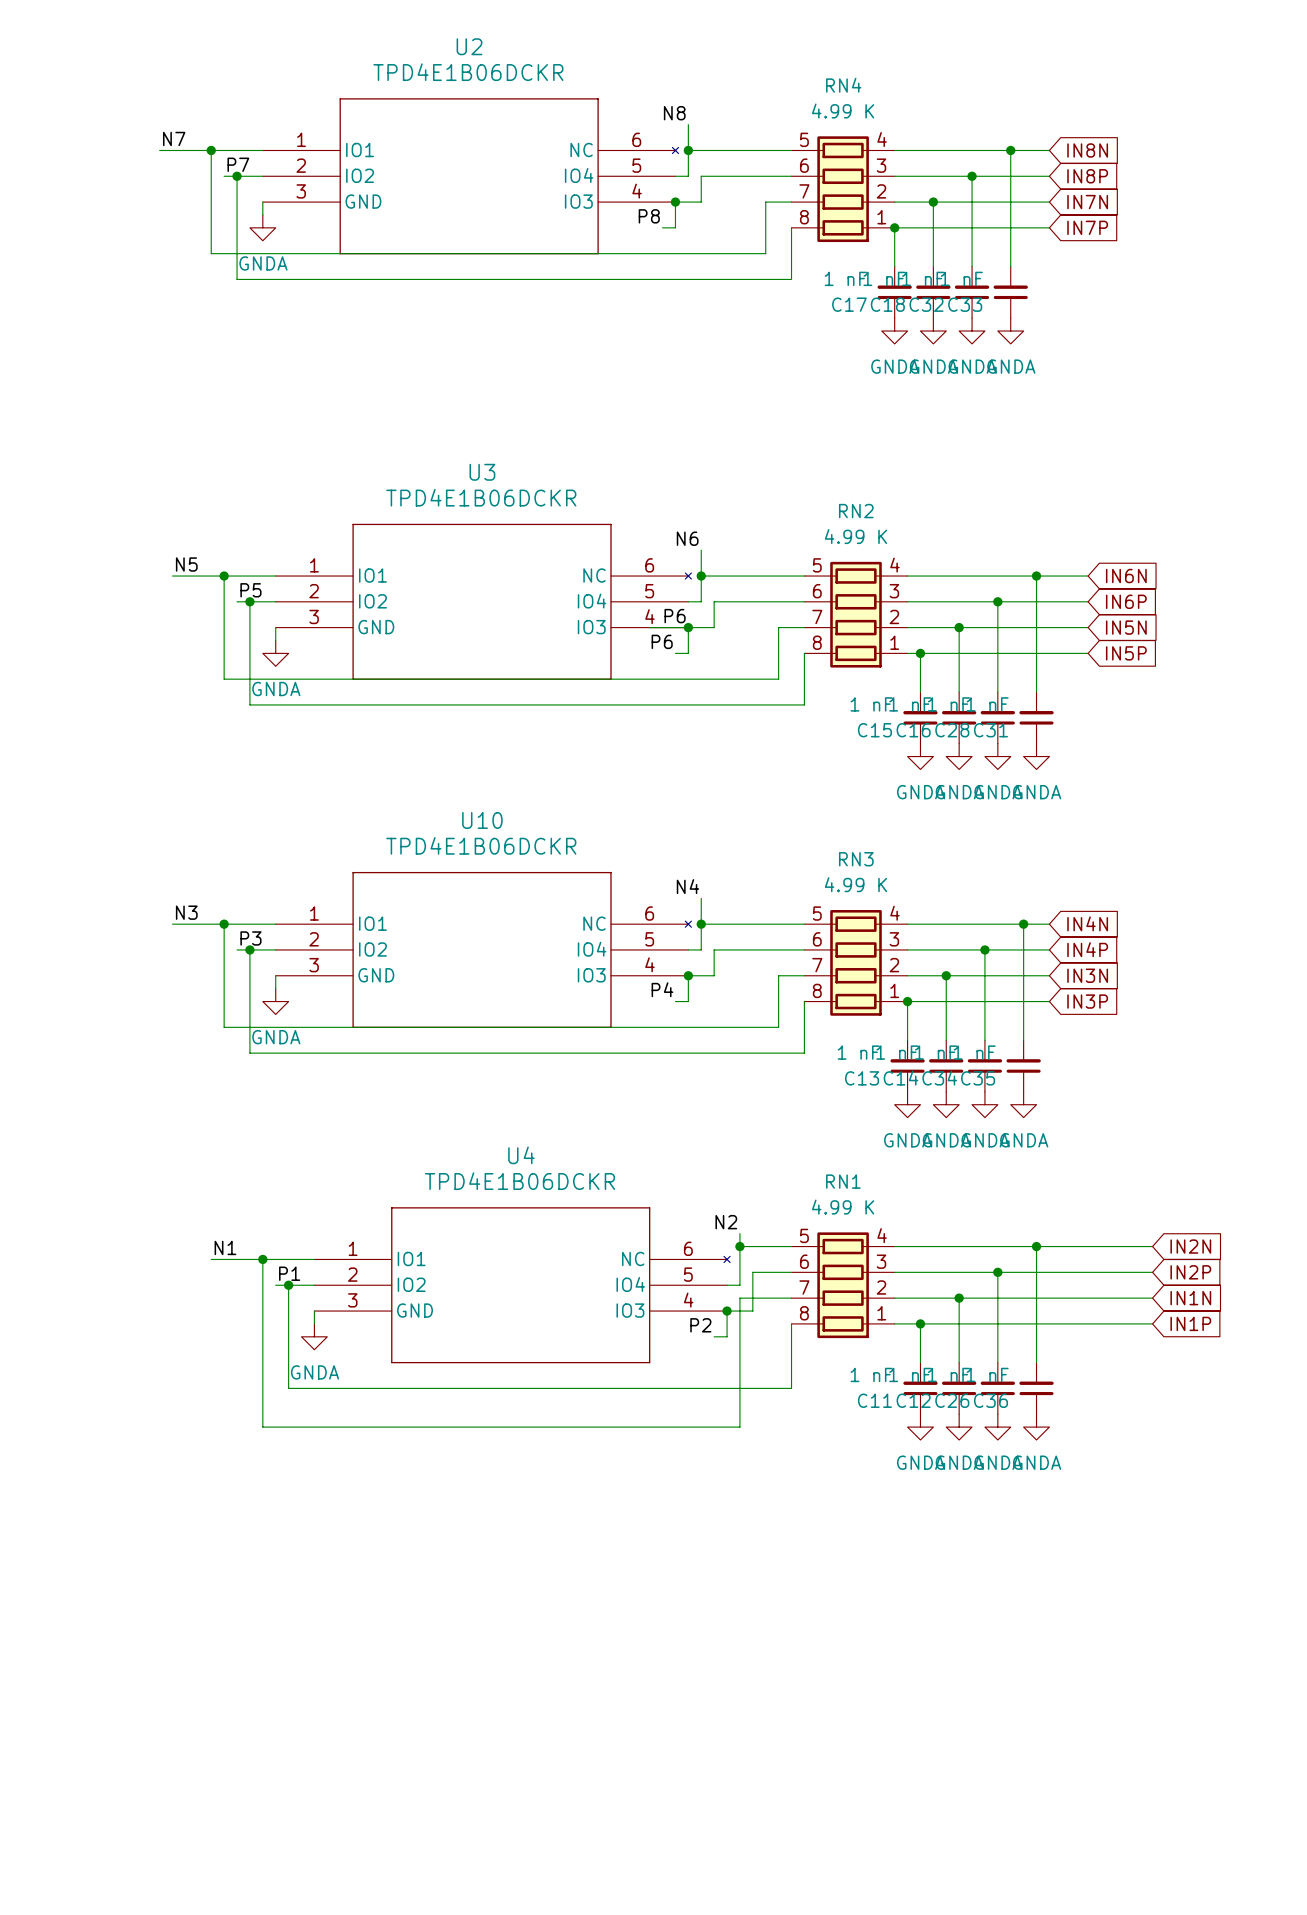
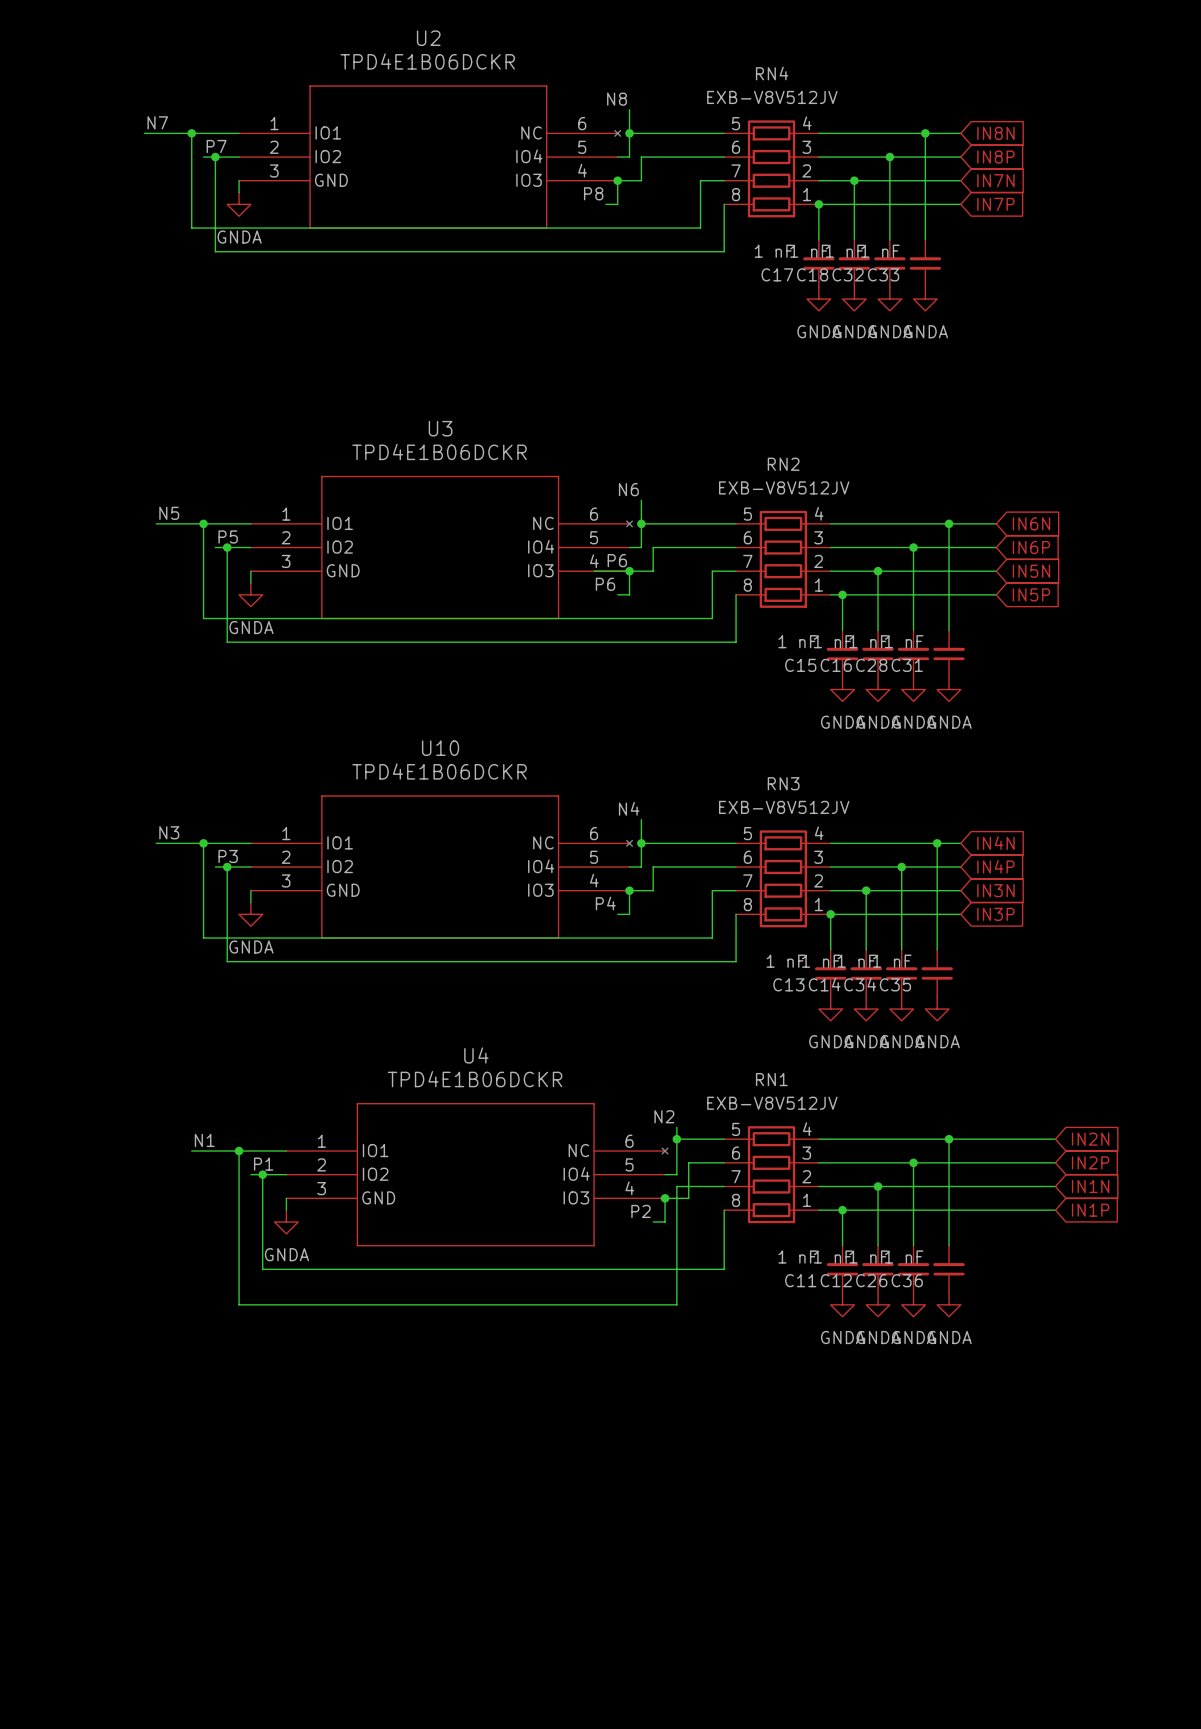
RN4 value: 4.99 K (843, 111) -> EXB-V8V512JV (772, 97)
RN2 value: 4.99 K (855, 536) -> EXB-V8V512JV (784, 487)
RN3 value: 4.99 K (855, 884) -> EXB-V8V512JV (784, 807)
RN1 value: 4.99 K (843, 1207) -> EXB-V8V512JV (772, 1103)

